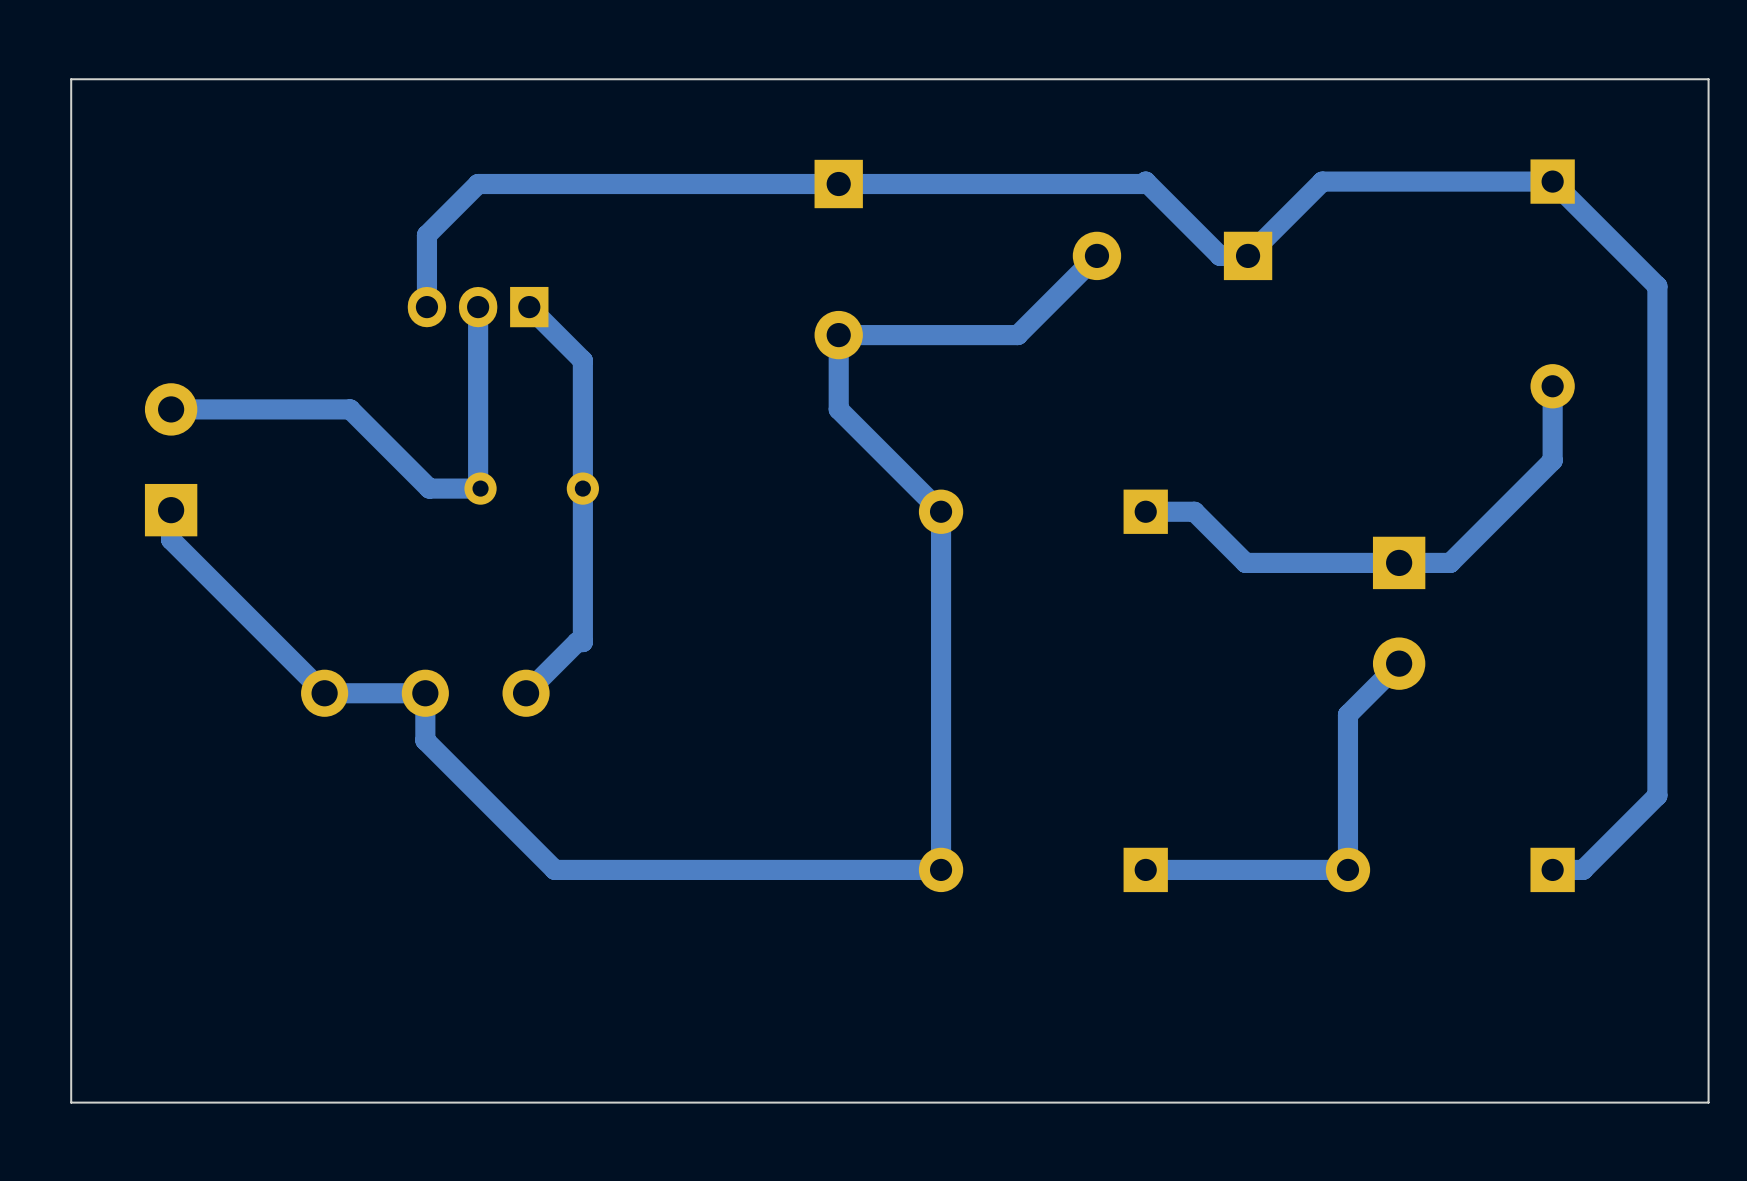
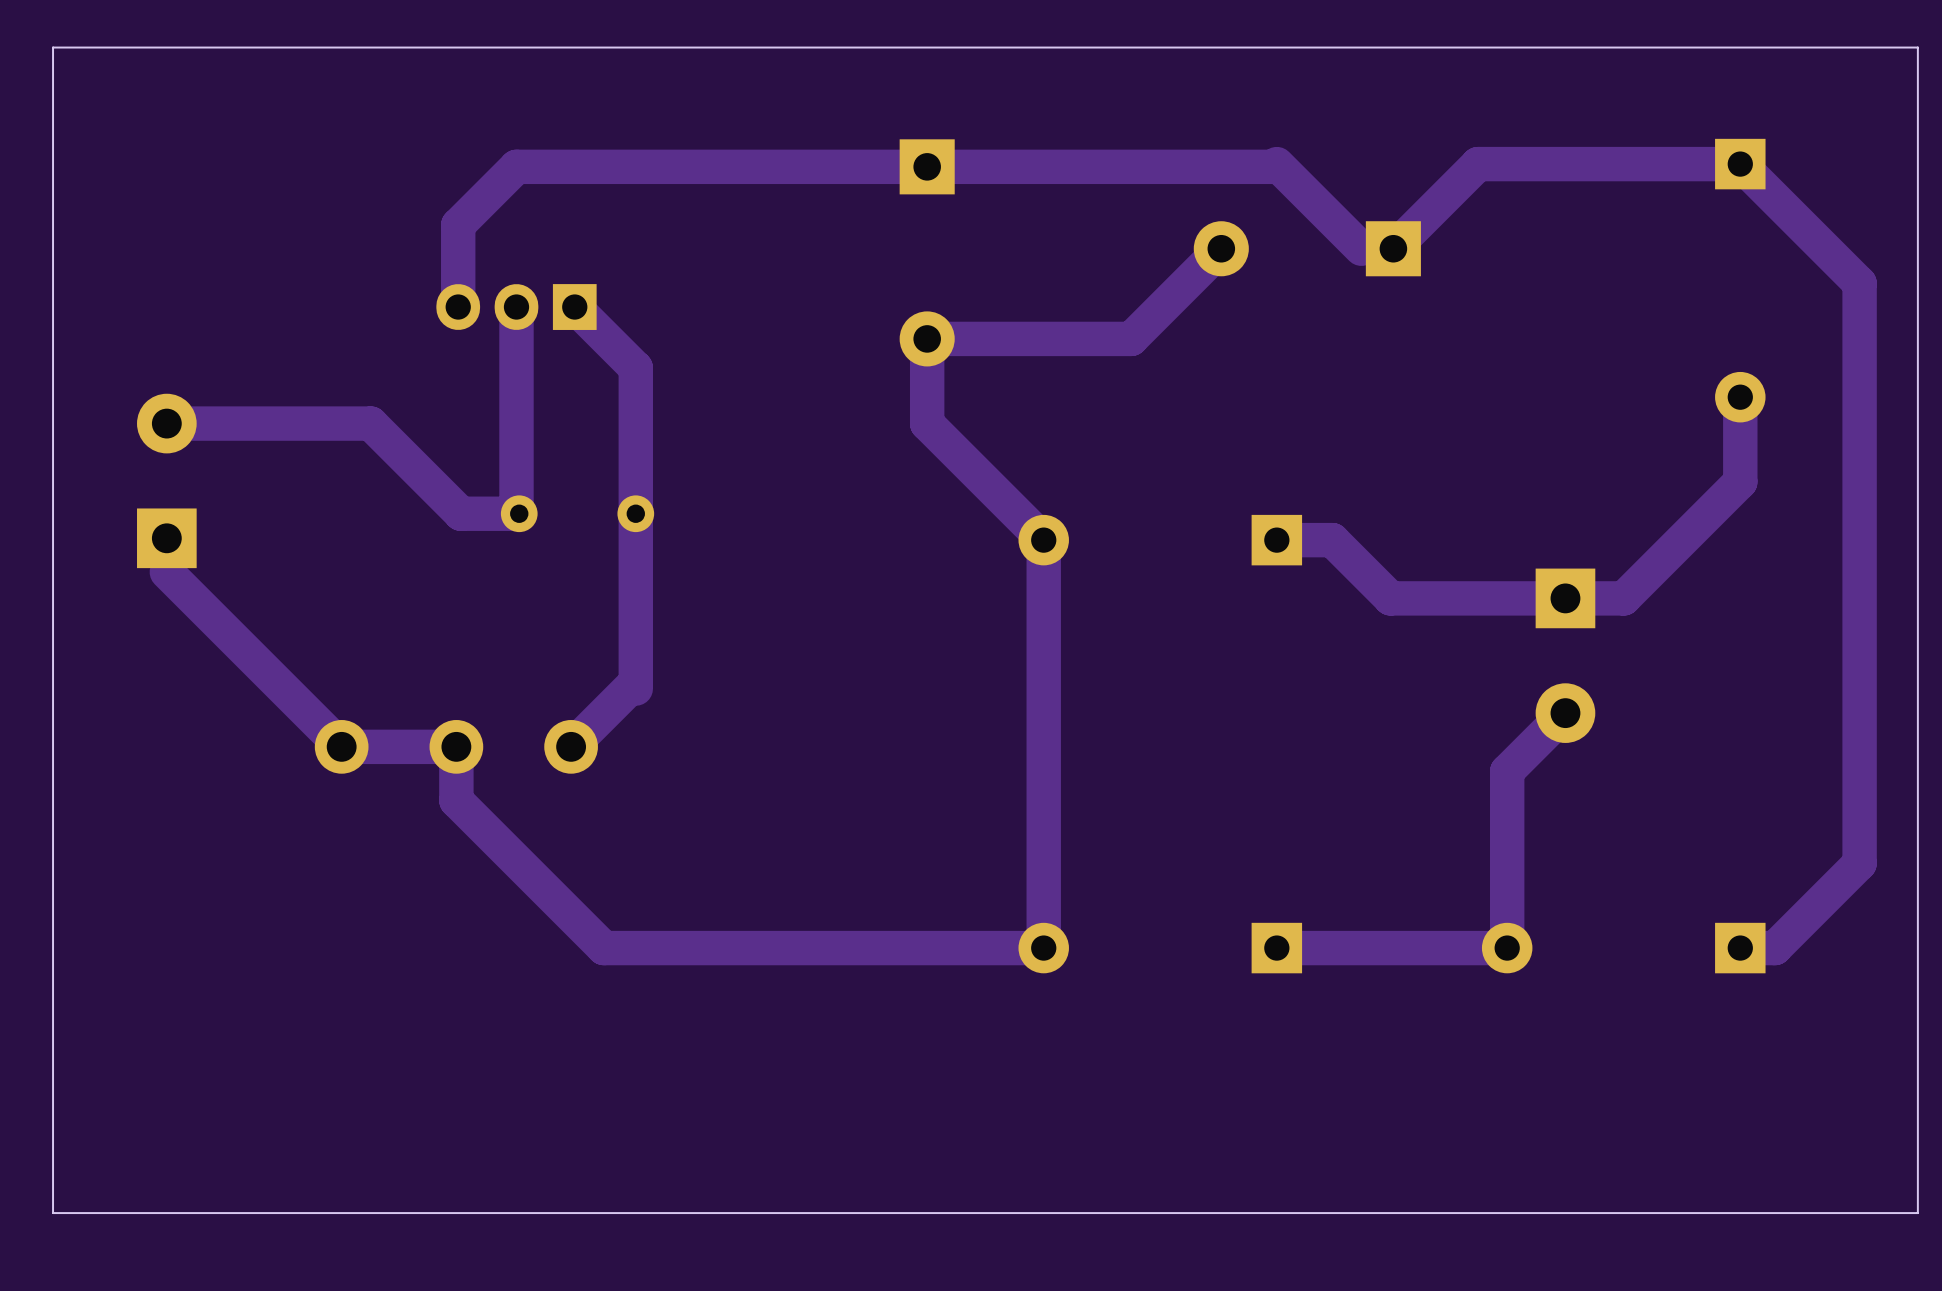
track width: thin (1145, 181) (1220, 255) -> thick (1276, 164) (1361, 248)
track width: thin (1143, 184) (478, 184) (426, 235) (426, 307) -> thick (1274, 166) (516, 166) (458, 225) (458, 307)
track width: thin (1096, 255) (1017, 335) (838, 335) (838, 409) (941, 511) (941, 869) (554, 869) (425, 740) (425, 693) (324, 693) (171, 539) -> thick (1221, 248) (1131, 338) (927, 338) (927, 423) (1043, 540) (1043, 948) (603, 948) (456, 800) (456, 746) (341, 746) (166, 572)
track width: thin (1248, 255) (1322, 181) (1552, 181) (1657, 286) (1657, 795) (1583, 869) (1552, 869) -> thick (1393, 248) (1478, 164) (1740, 164) (1859, 283) (1859, 863) (1774, 948) (1740, 948)
track width: thin (478, 307) (478, 486) -> thick (516, 307) (516, 510)
track width: thin (529, 307) (582, 360) (582, 642) -> thick (574, 307) (635, 368) (635, 688)
track width: thin (1552, 386) (1552, 460) (1450, 562) (1245, 562) (1194, 511) (1145, 511) -> thick (1740, 397) (1740, 481) (1623, 598) (1390, 598) (1332, 540) (1276, 540)
track width: thin (171, 409) (350, 409) (429, 488) (480, 488) -> thick (166, 423) (370, 423) (460, 513) (519, 513)
track width: thin (577, 642) (526, 693) -> thick (629, 688) (571, 746)
track width: thin (1399, 663) (1347, 714) (1347, 869) (1145, 869) -> thick (1565, 713) (1507, 771) (1507, 948) (1276, 948)

